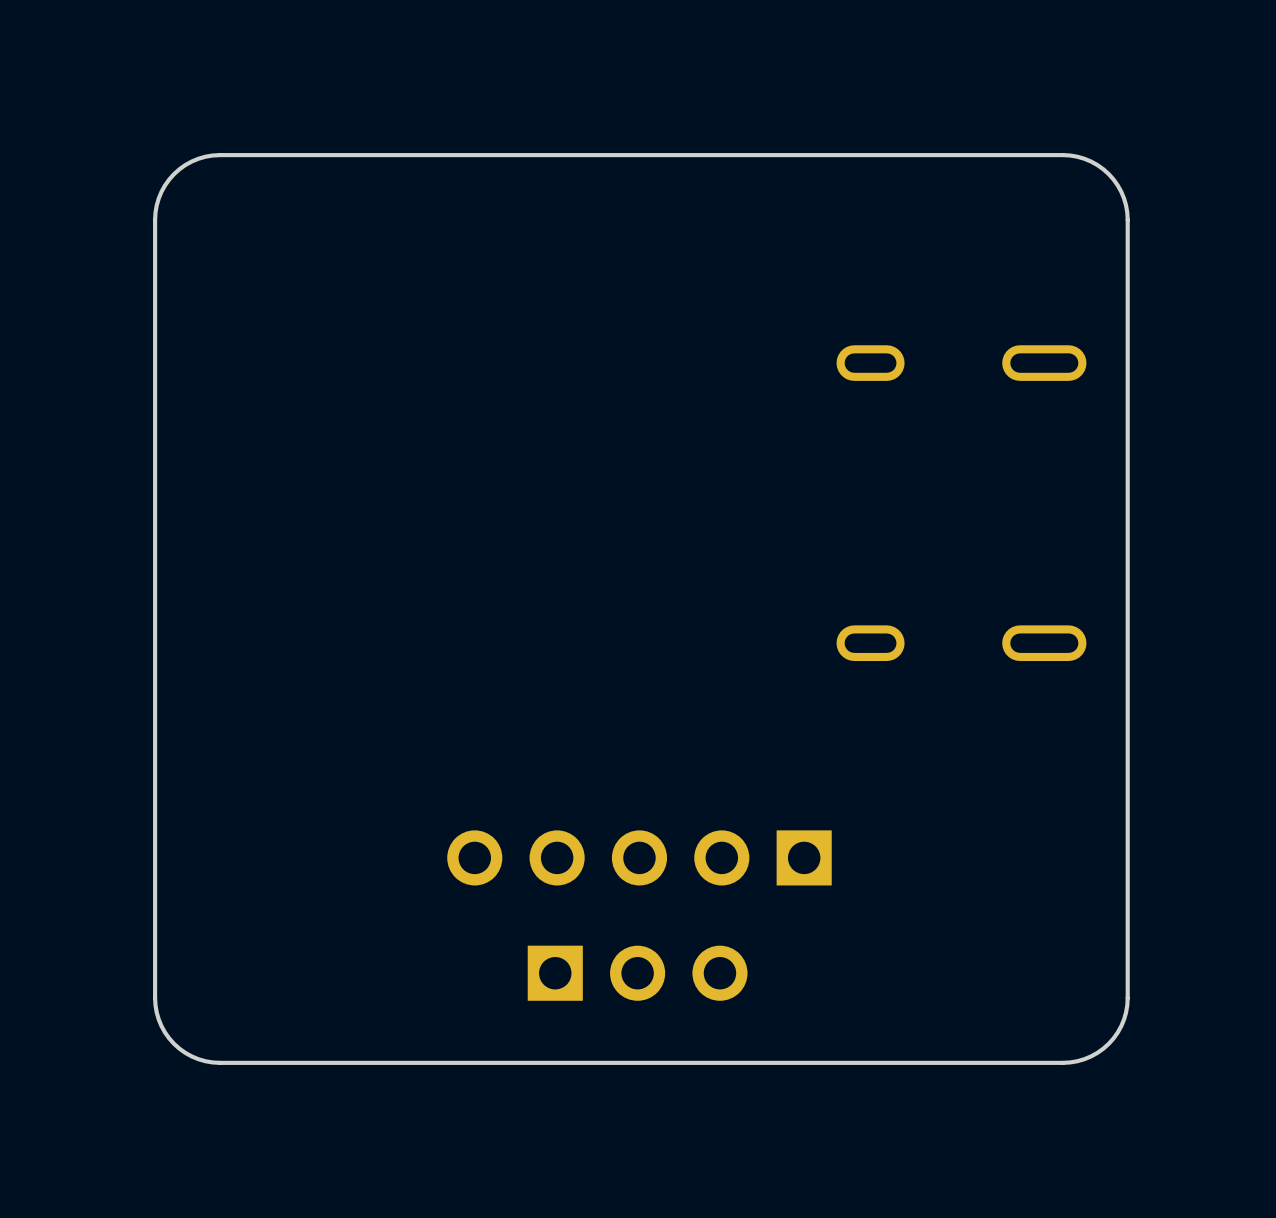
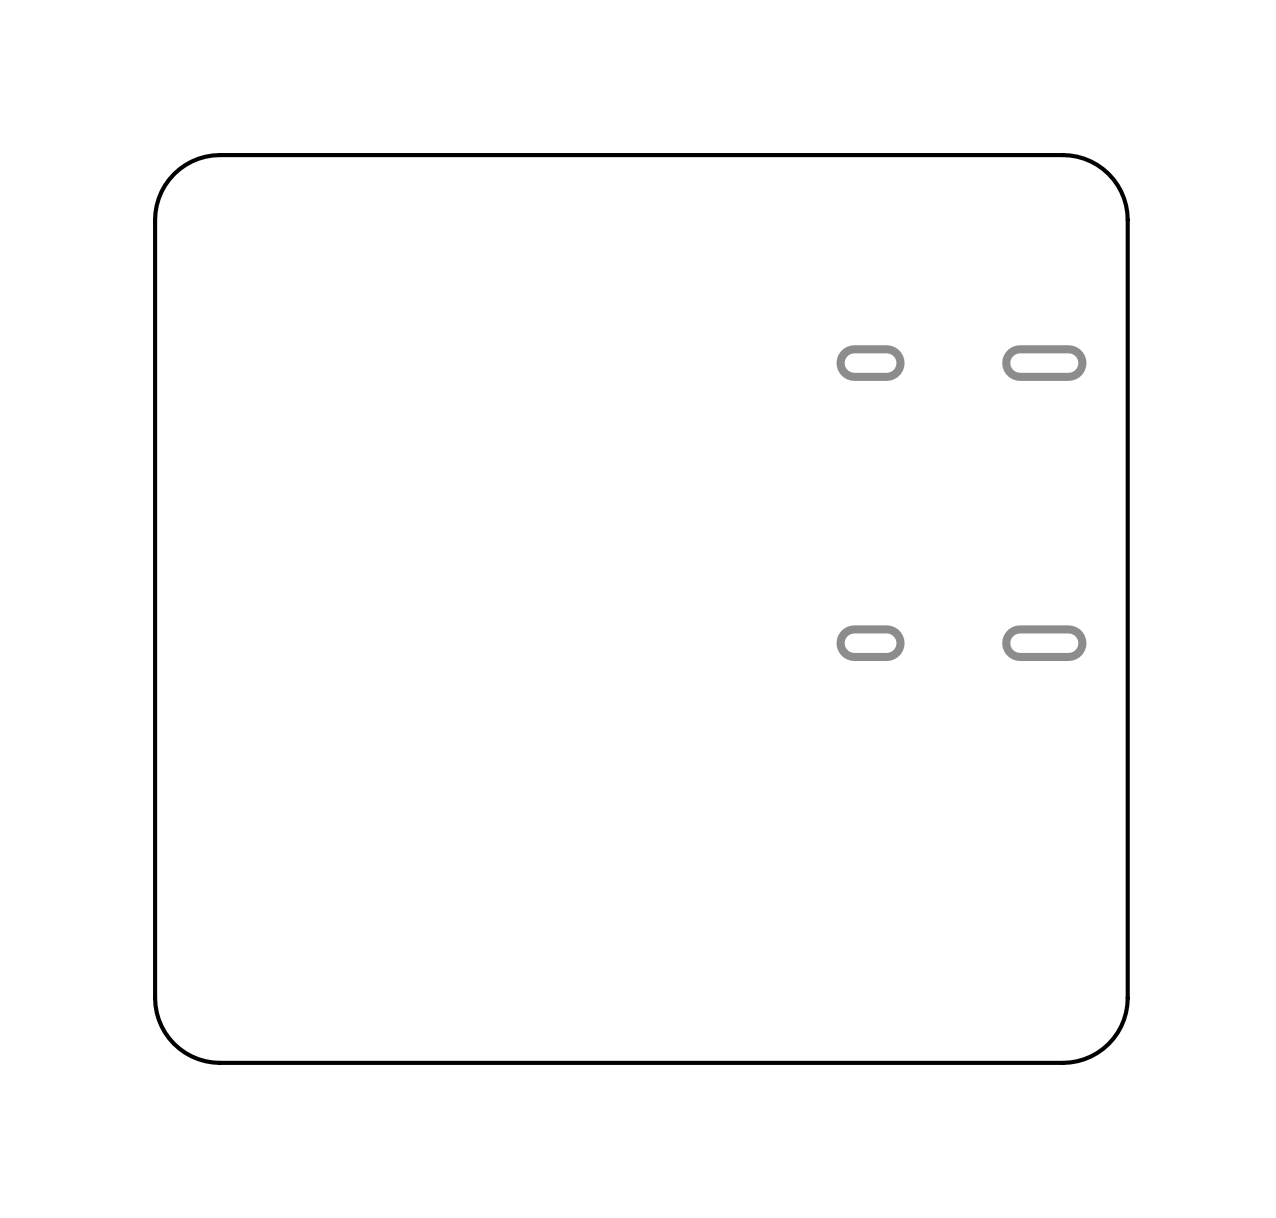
part: (639, 857) -> none
part: (637, 973) -> none

